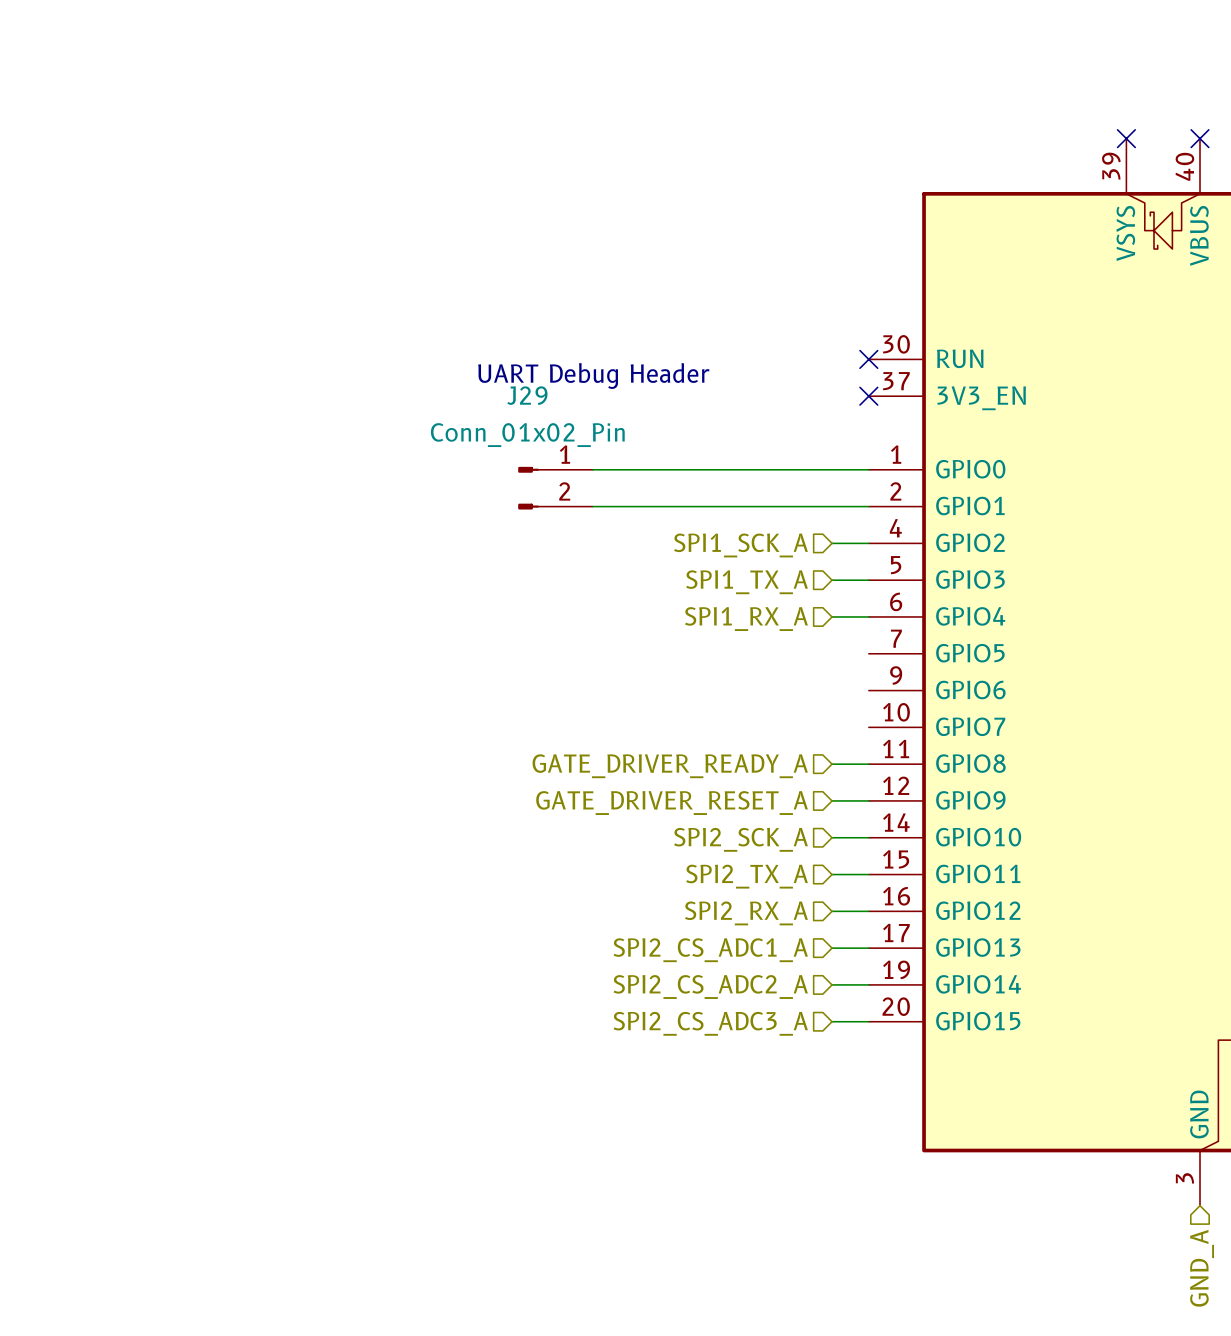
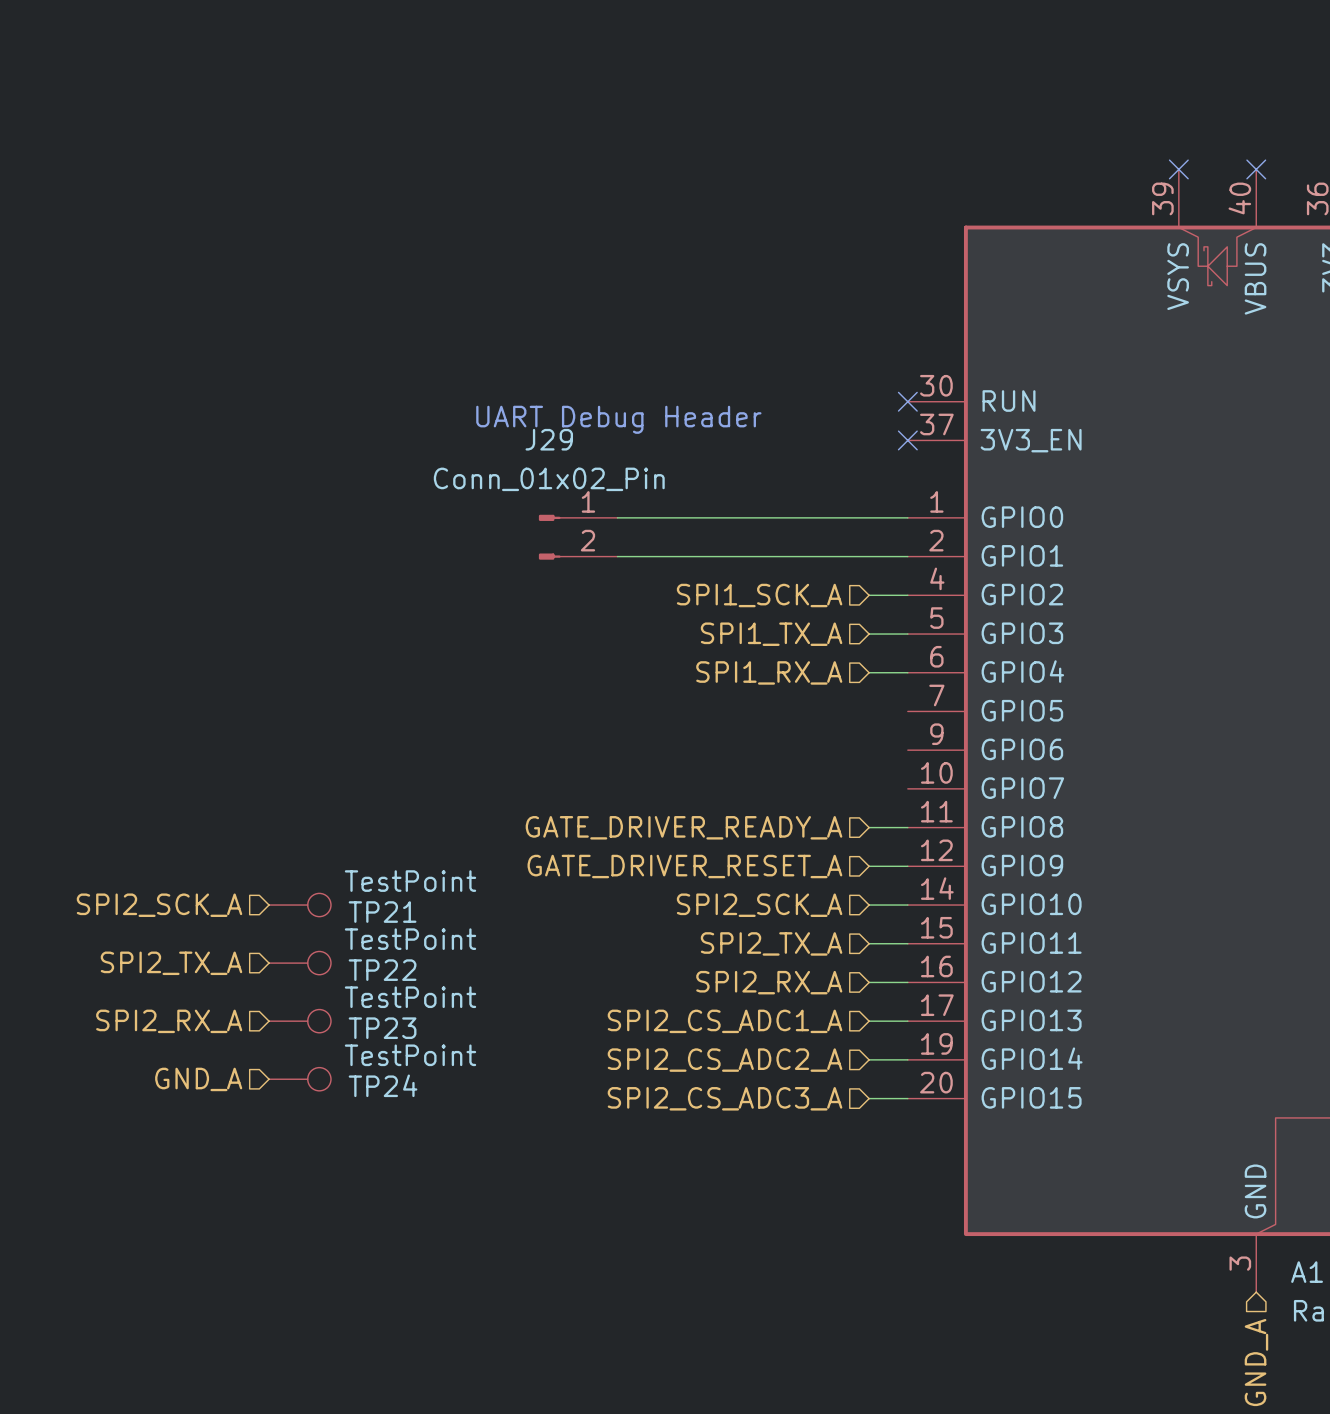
TP21: none -> TestPoint (300, 905)
hierarchical label: none -> SPI2_SCK_A (159, 905)
TP22: none -> TestPoint (300, 963)
hierarchical label: none -> SPI2_TX_A (171, 963)
TP23: none -> TestPoint (300, 1021)
hierarchical label: none -> SPI2_RX_A (169, 1021)
TP24: none -> TestPoint (300, 1079)
hierarchical label: none -> GND_A (198, 1079)

